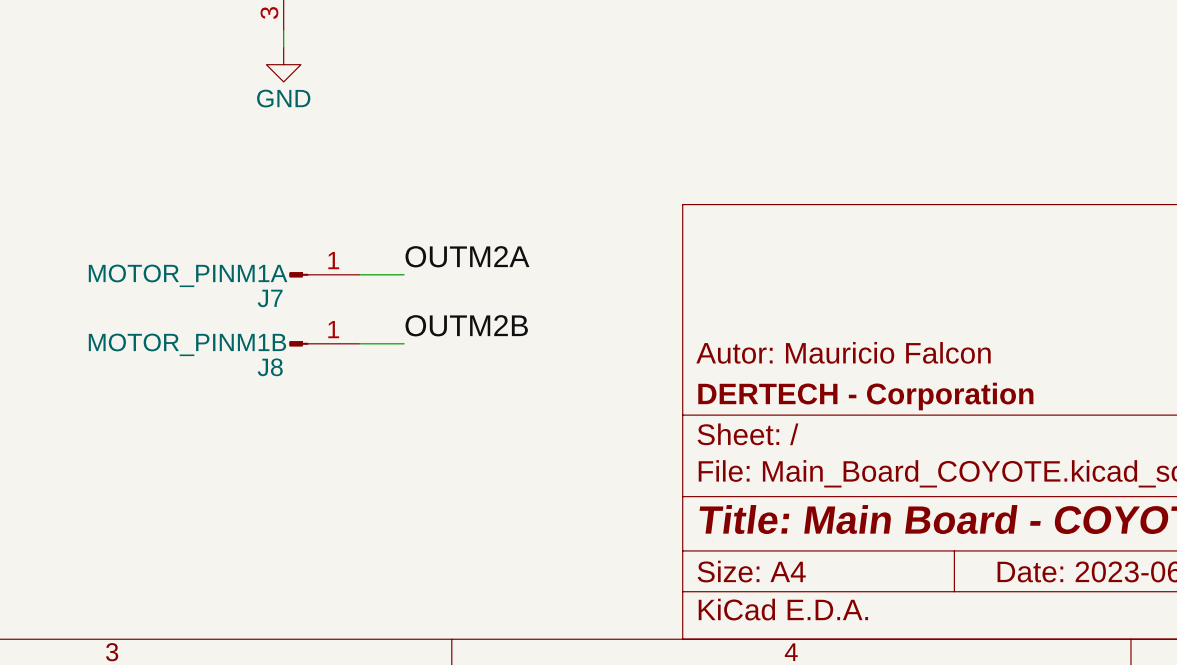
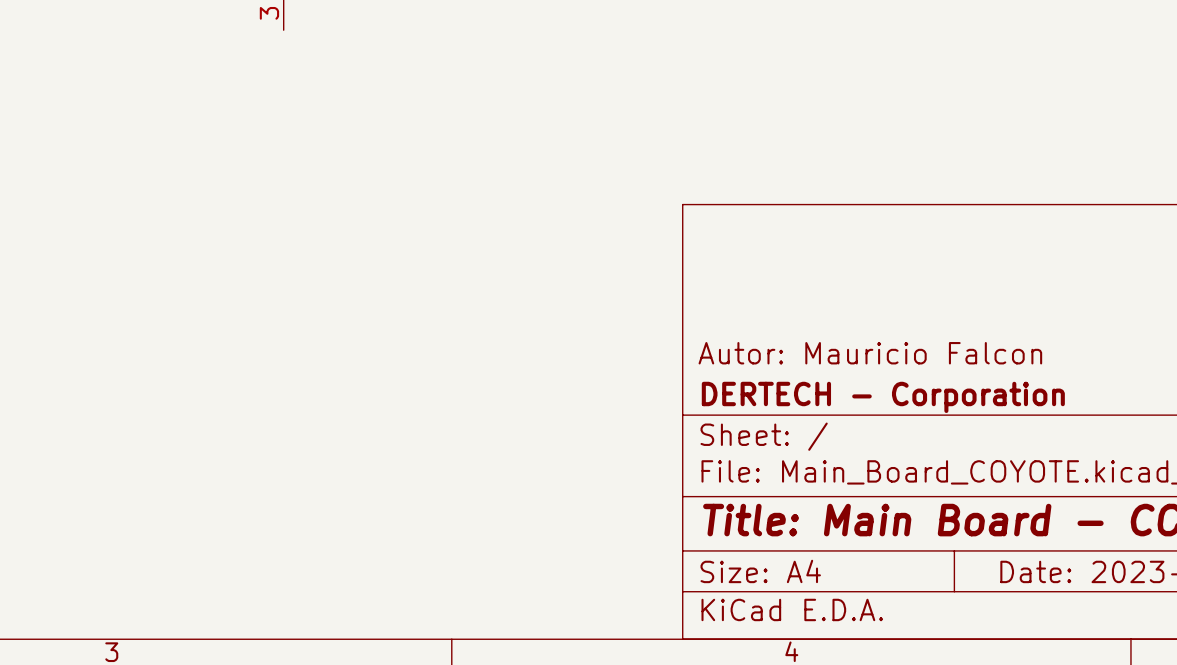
wire: (283, 30) (283, 47) -> none
power symbol: GND (283, 64) -> none
label: OUTM2A (467, 256) -> none
J7: MOTOR_PINM1A (324, 274) -> none
wire: (359, 274) (404, 274) -> none
label: OUTM2B (466, 325) -> none
J8: MOTOR_PINM1B (324, 343) -> none
wire: (359, 343) (404, 343) -> none

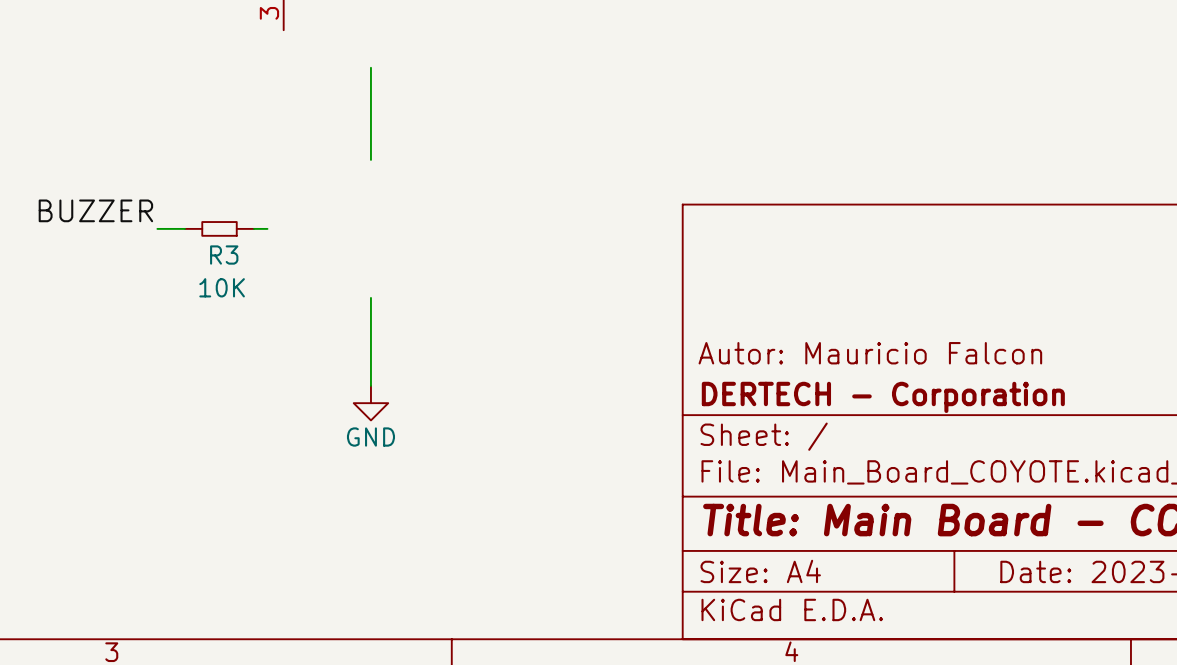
wire: none -> (370, 67) (370, 159)
label: none -> BUZZER (95, 210)
wire: none -> (157, 228) (185, 228)
R3: none -> 10K (219, 228)
wire: none -> (254, 228) (267, 228)
wire: none -> (370, 297) (370, 385)
power symbol: none -> GND (370, 403)

